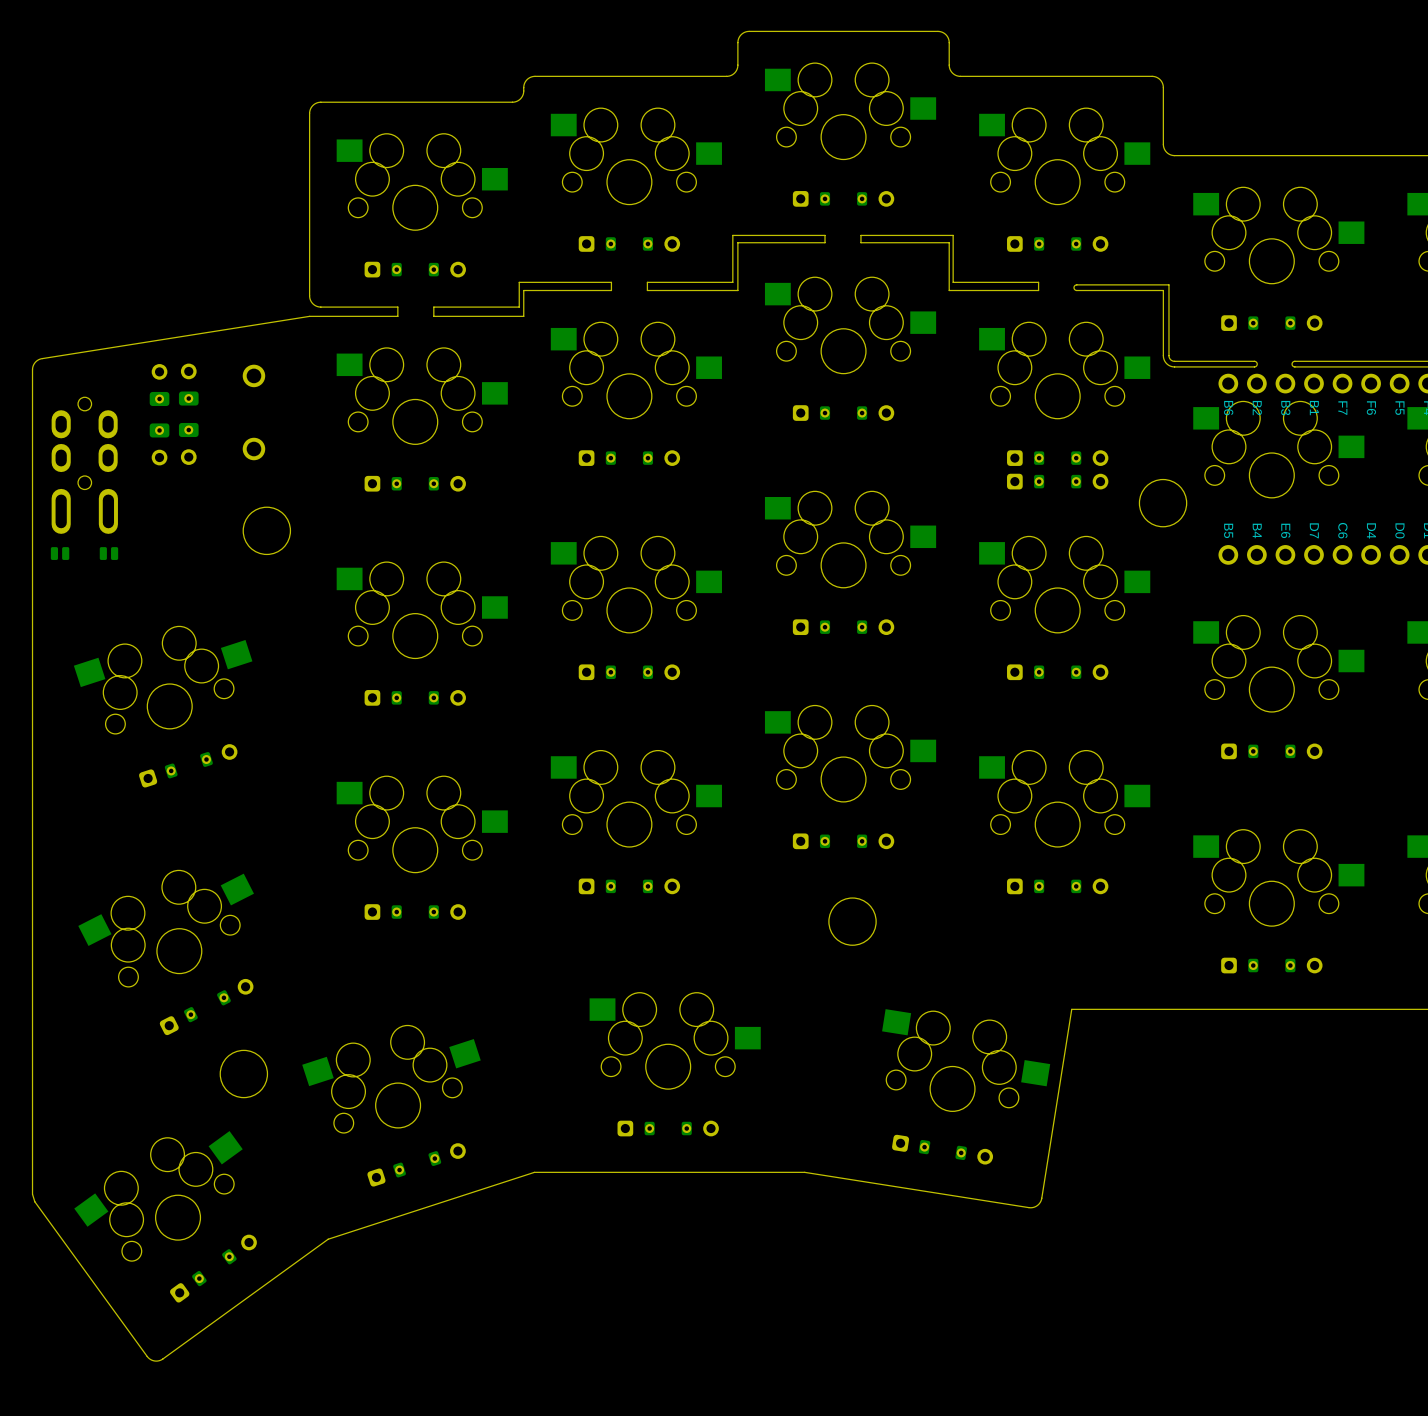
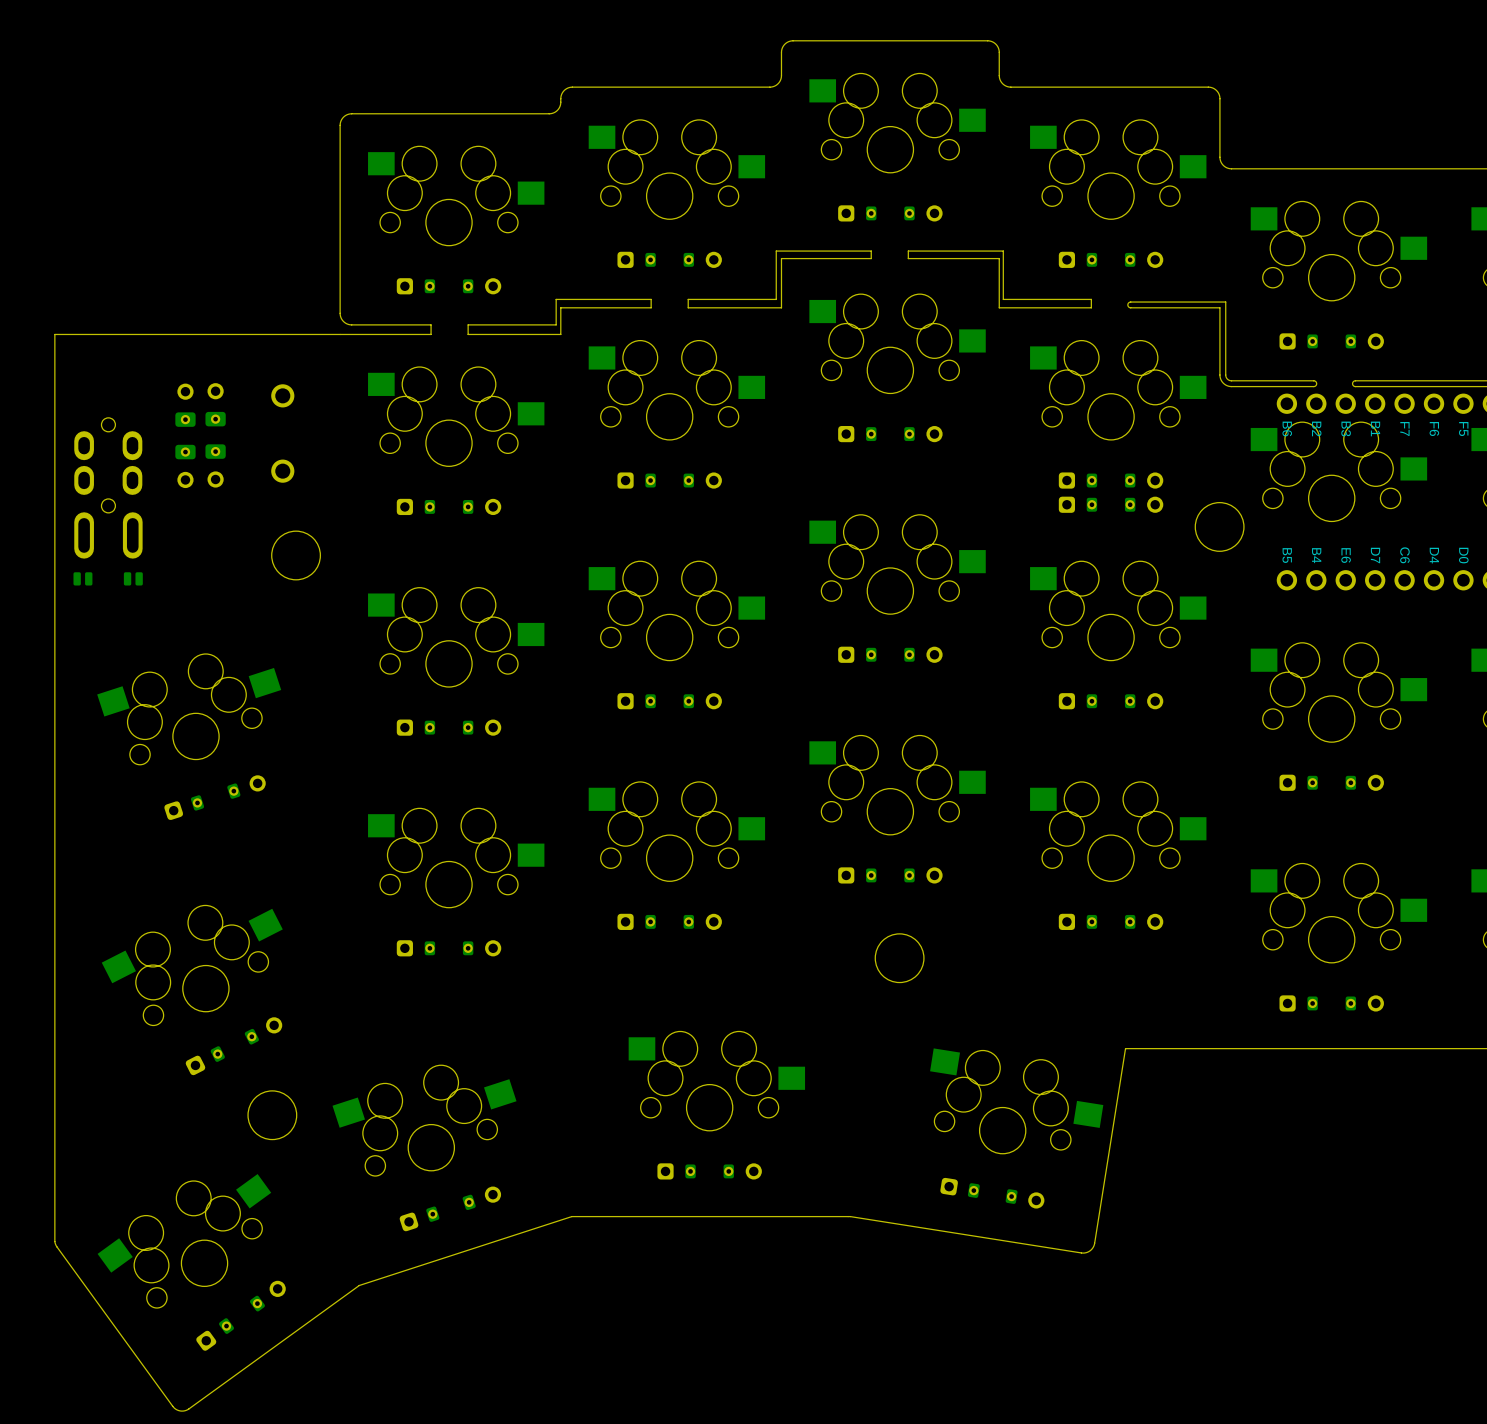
board edge: (309, 316) (41, 358) (35, 362) (32, 367) (32, 1194) (34, 1201) -> (340, 334) (54, 334) (54, 1241) (56, 1246)

